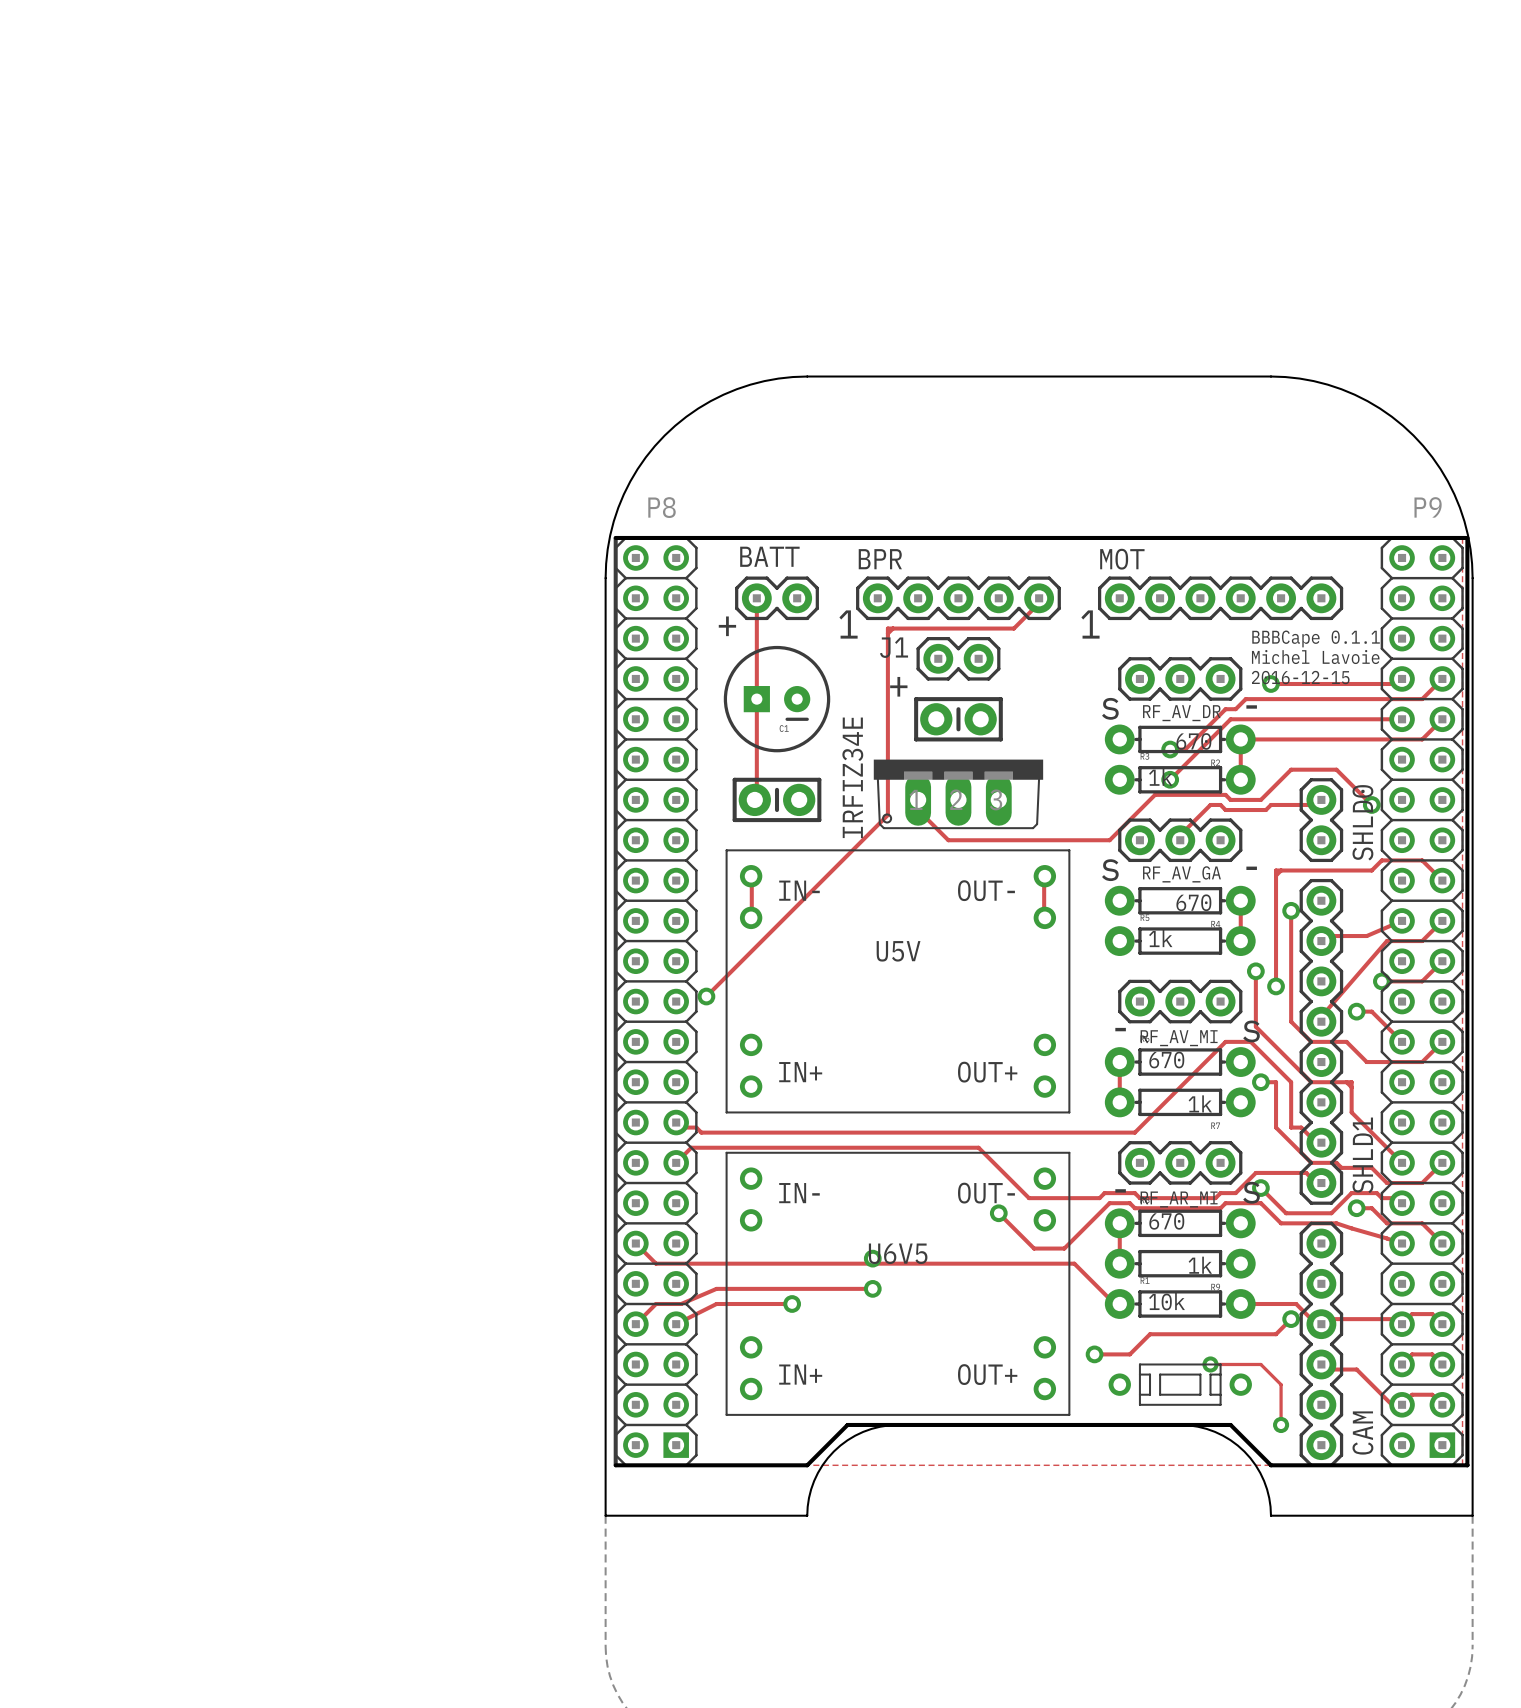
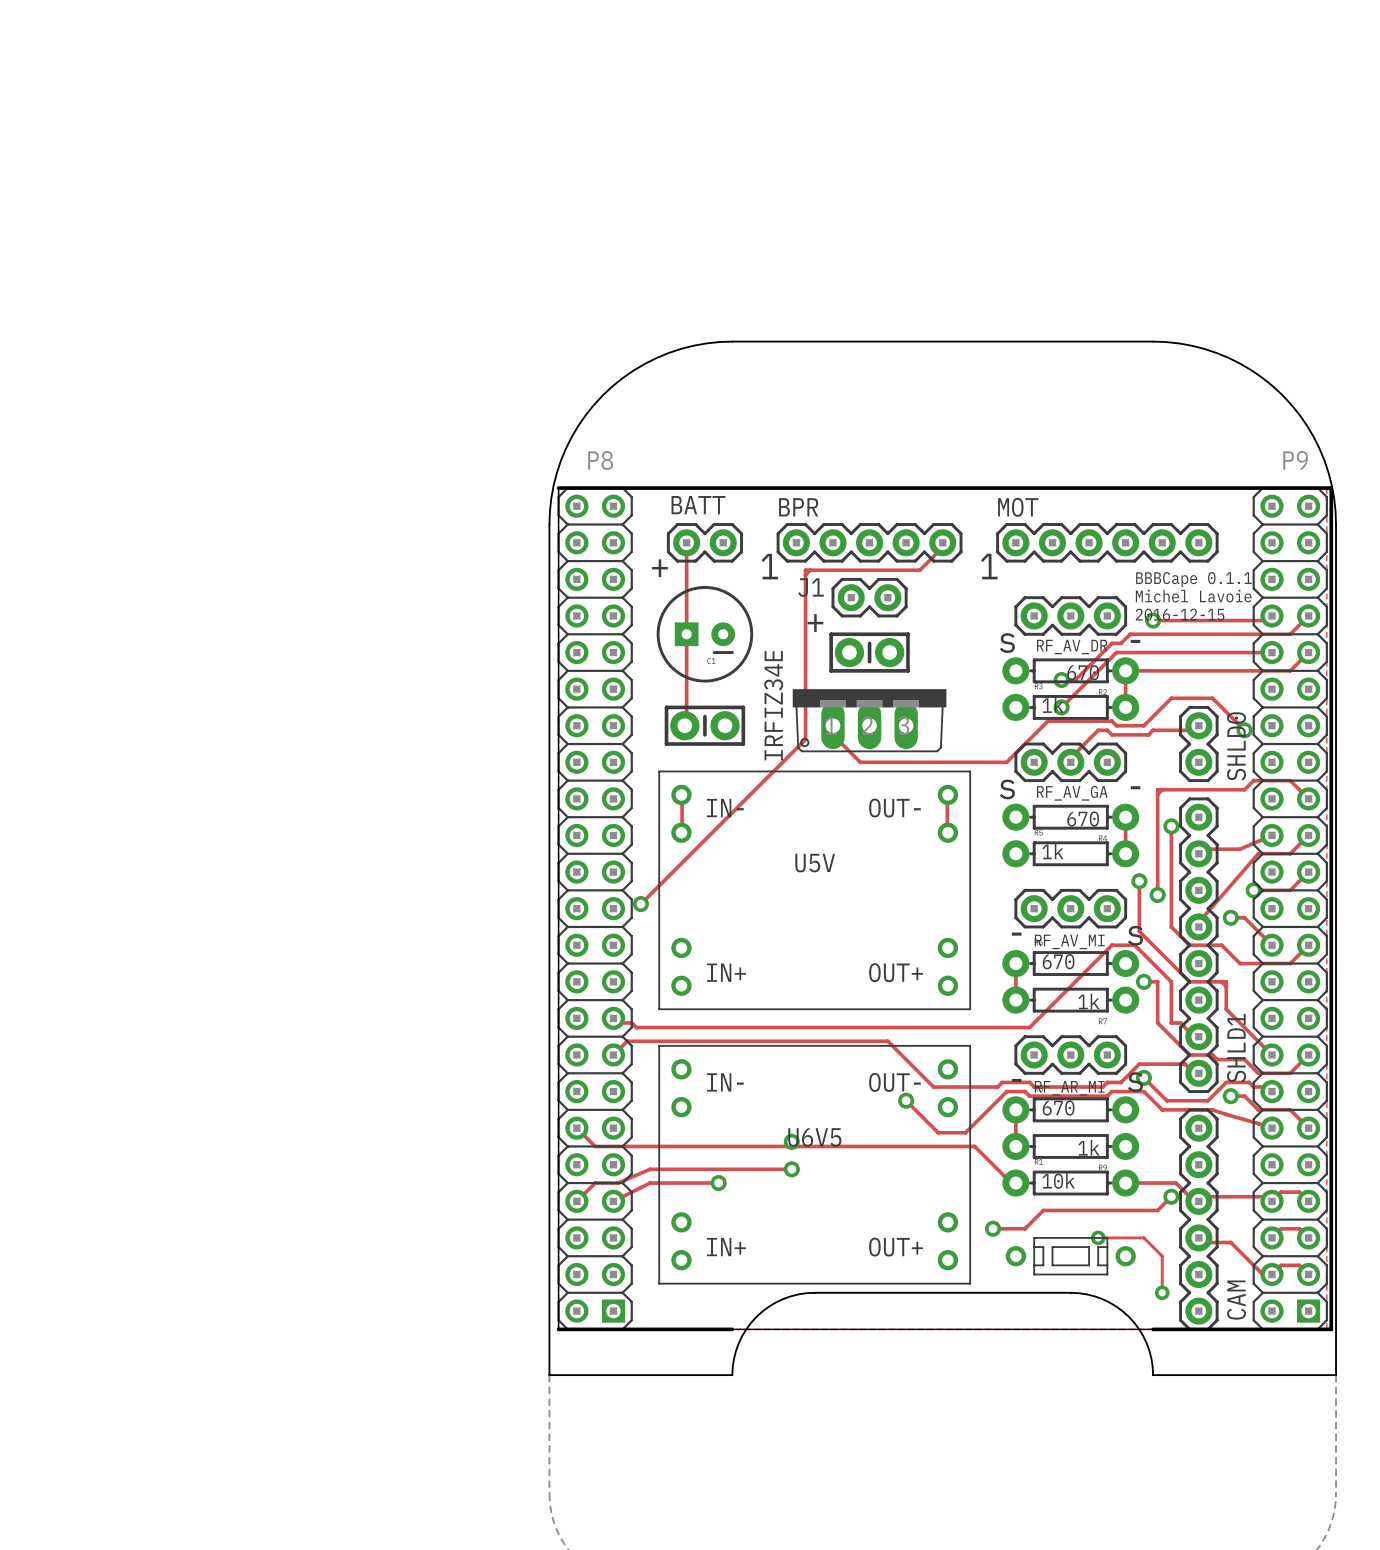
board edge: none -> (558, 488) (558, 1329)
line: (615, 537) (615, 1465) -> none
board edge: (807, 1465) (847, 1424) (1230, 1424) (1270, 1465) -> (732, 1329) (1153, 1329)

